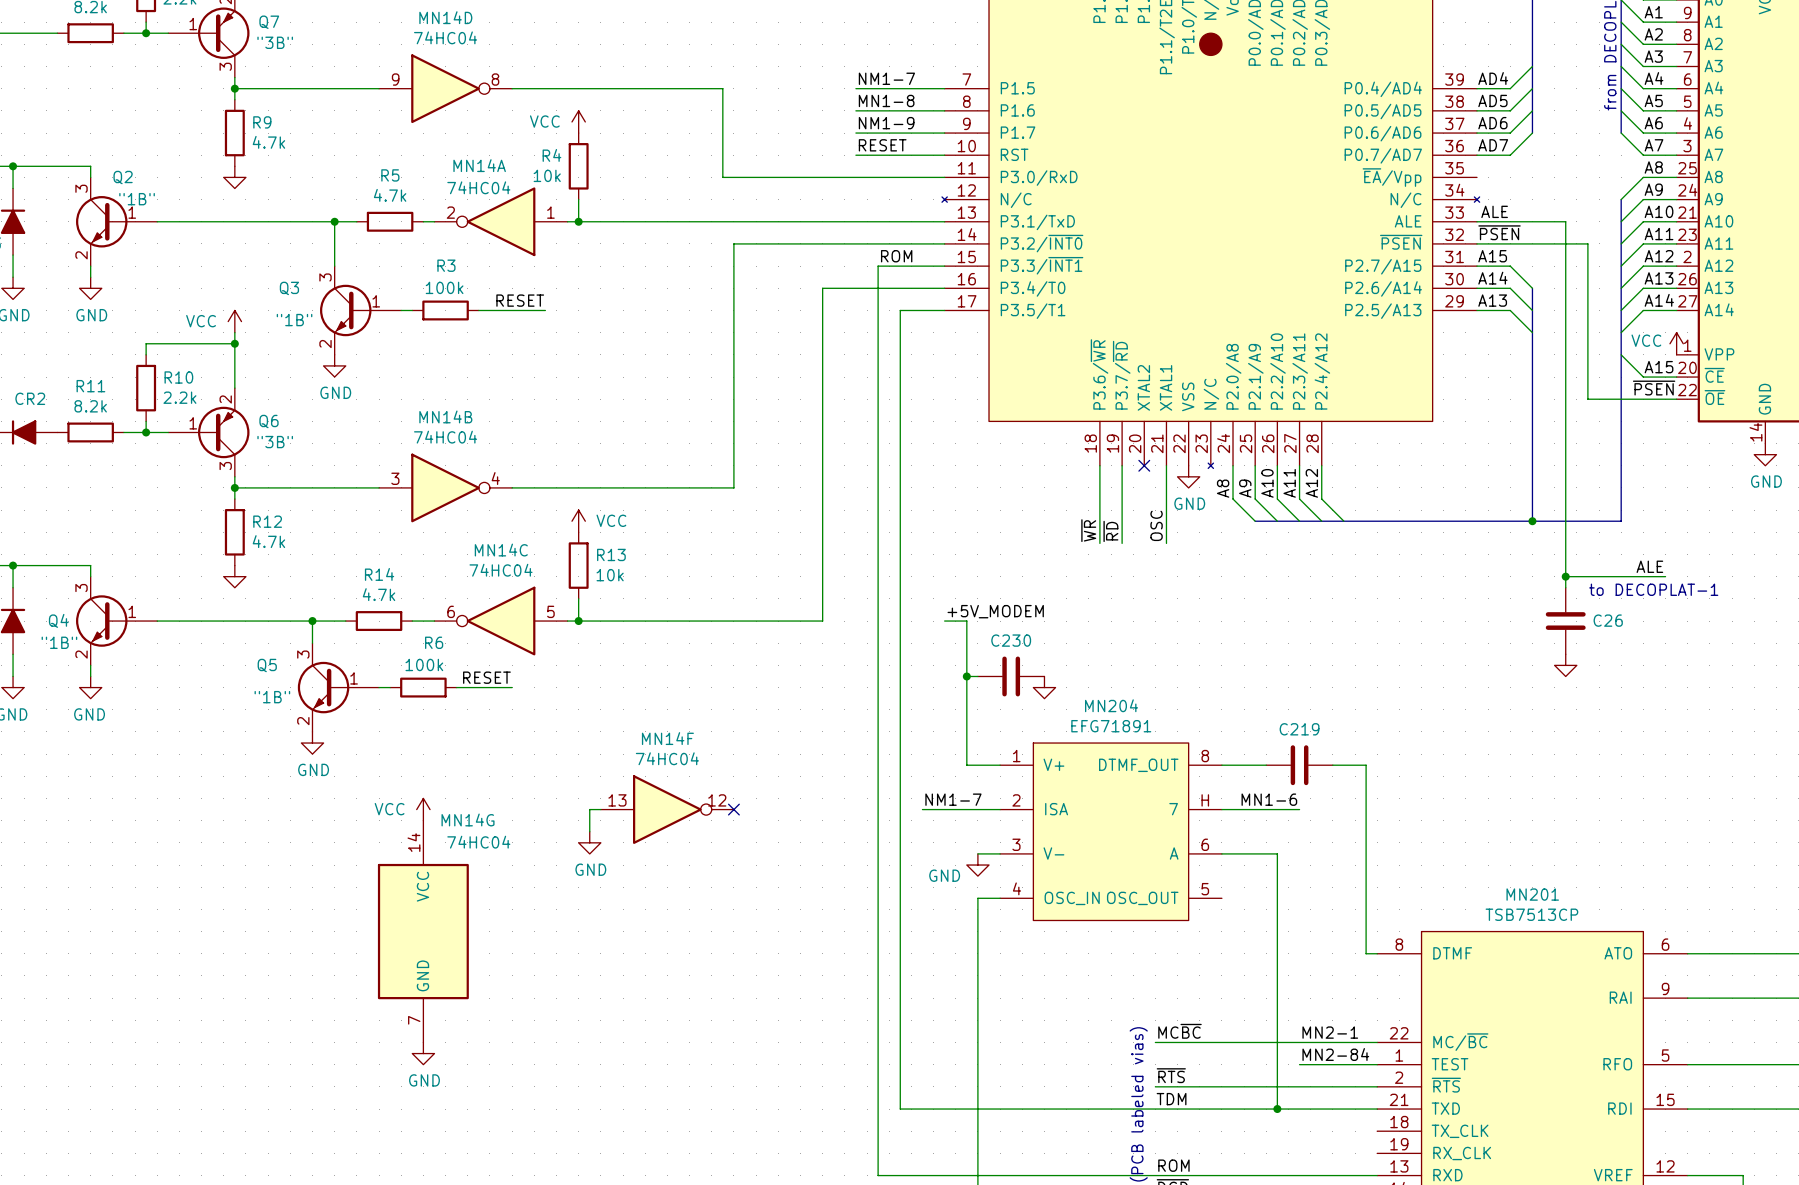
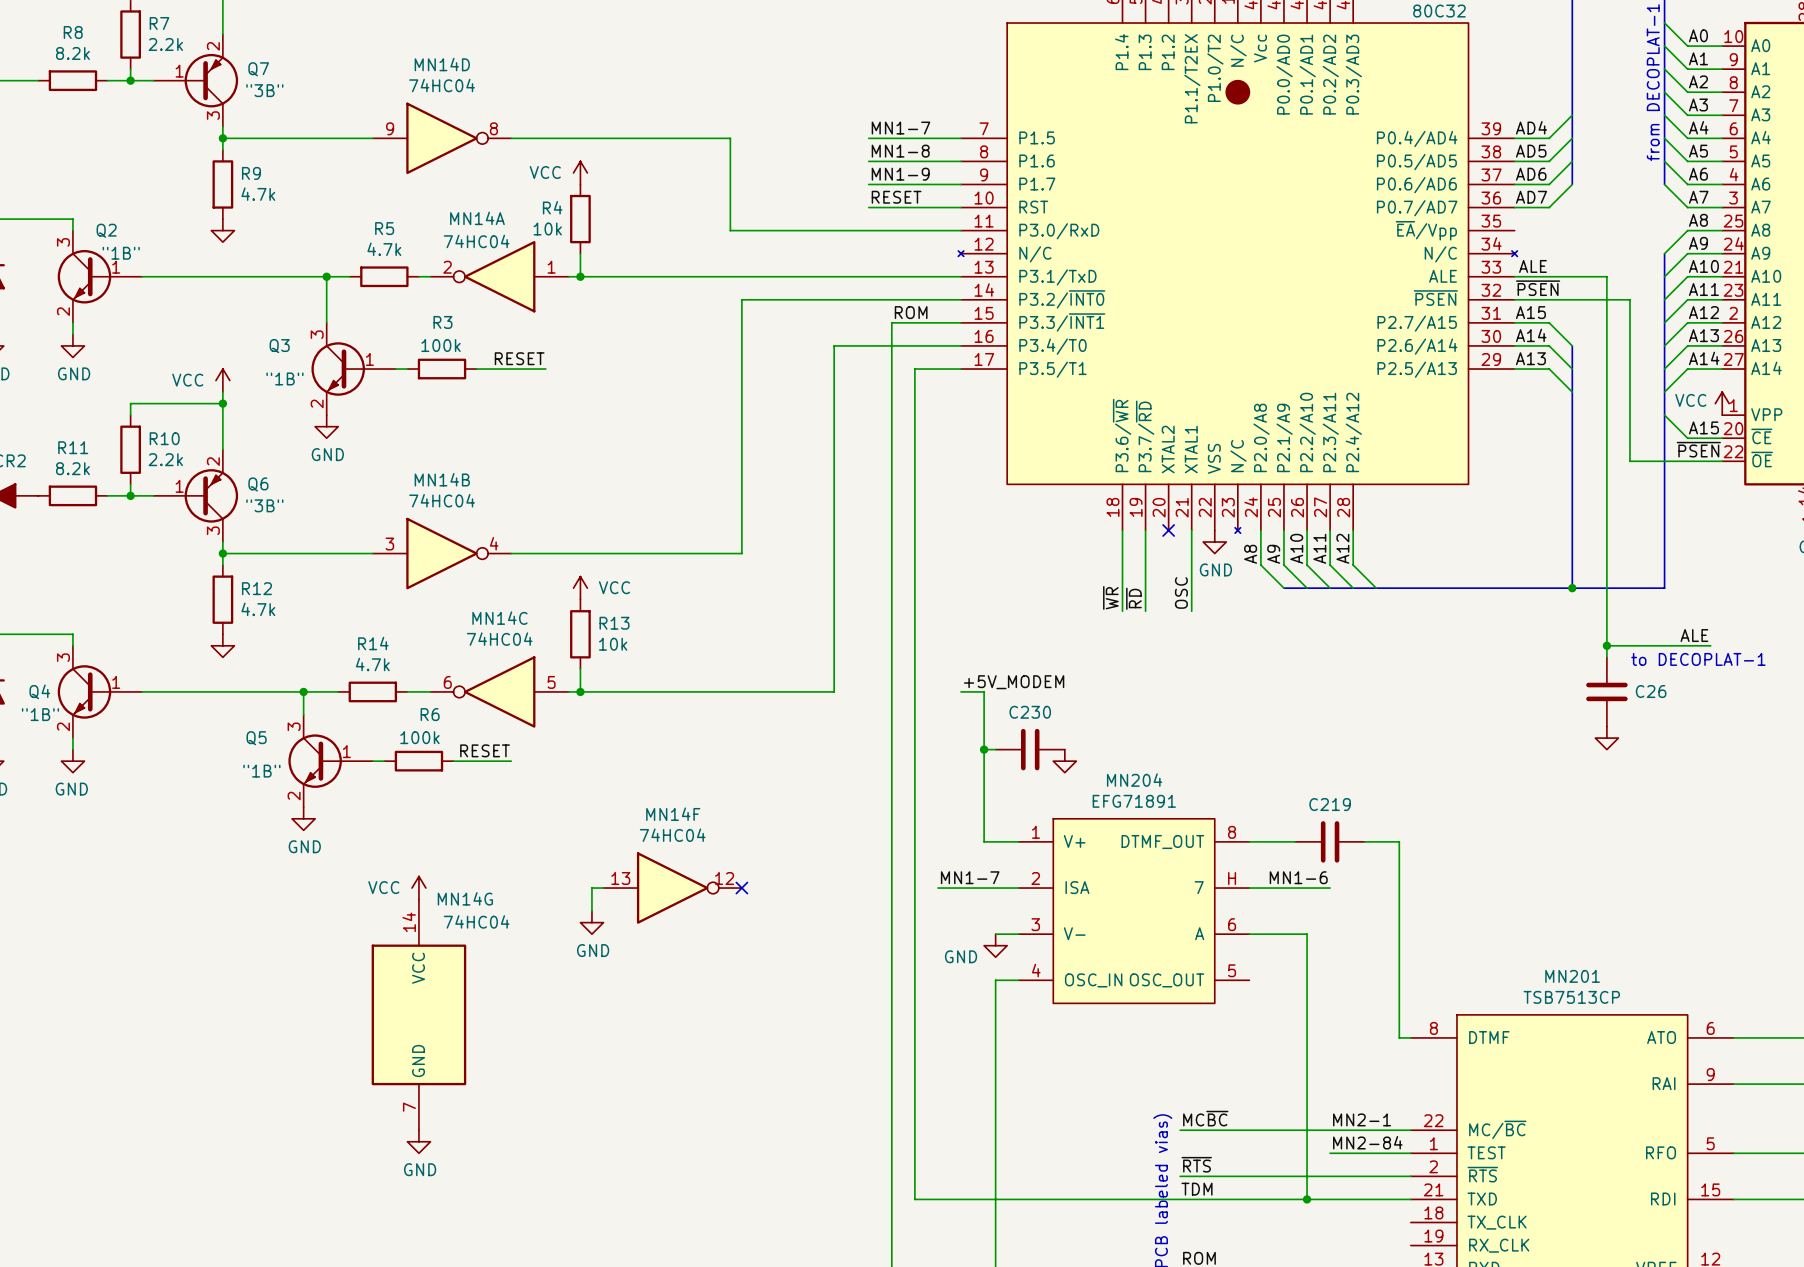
label: NM1-7 (886, 78) -> MN1-7 (900, 128)
label: NM1-9 (886, 123) -> MN1-9 (900, 174)
label: NM1-7 (953, 799) -> MN1-7 (970, 877)

